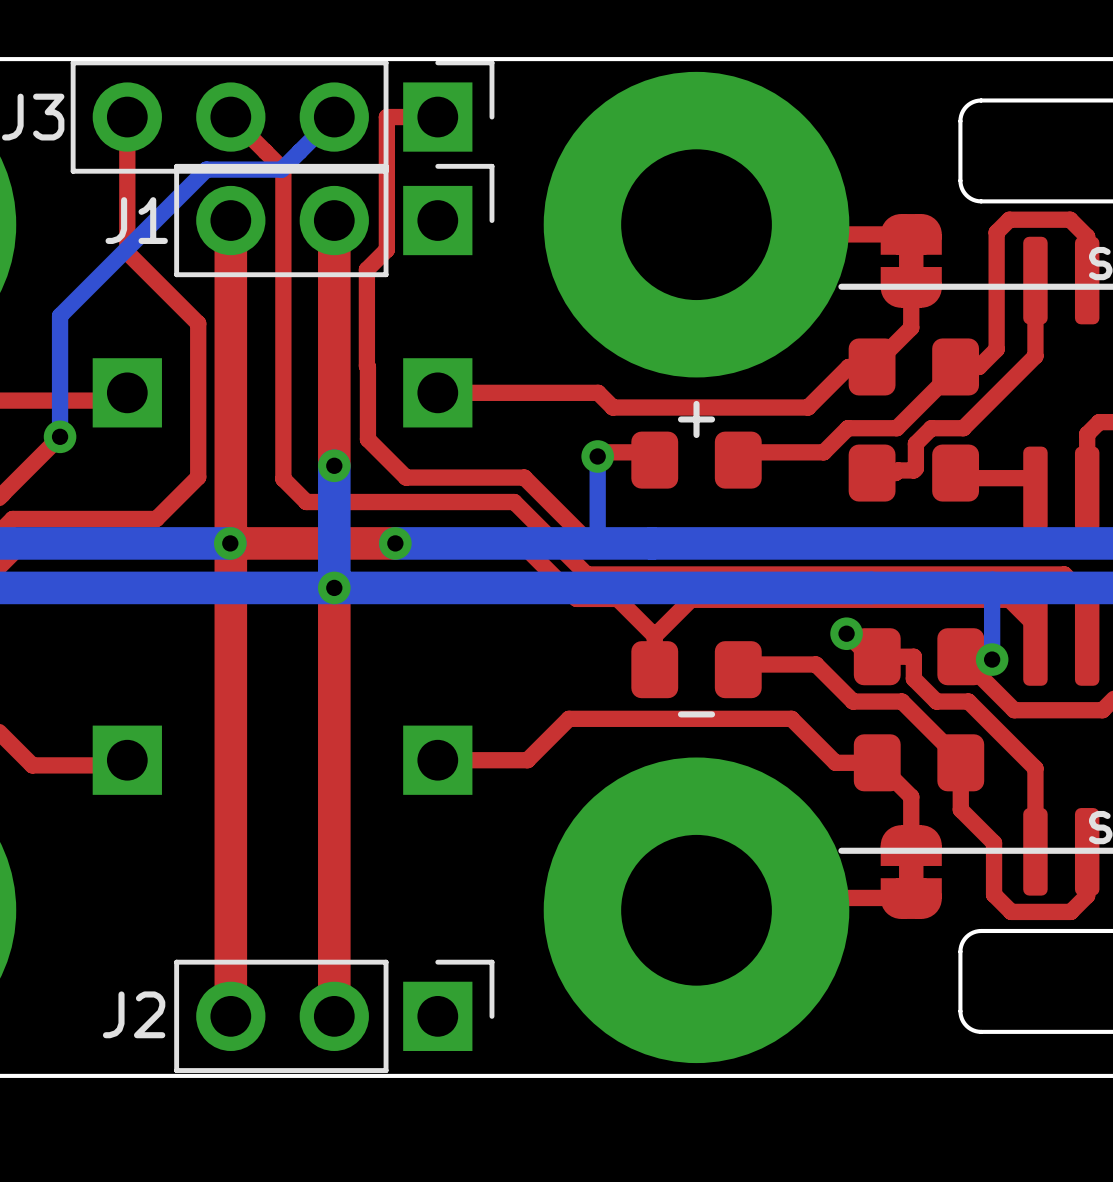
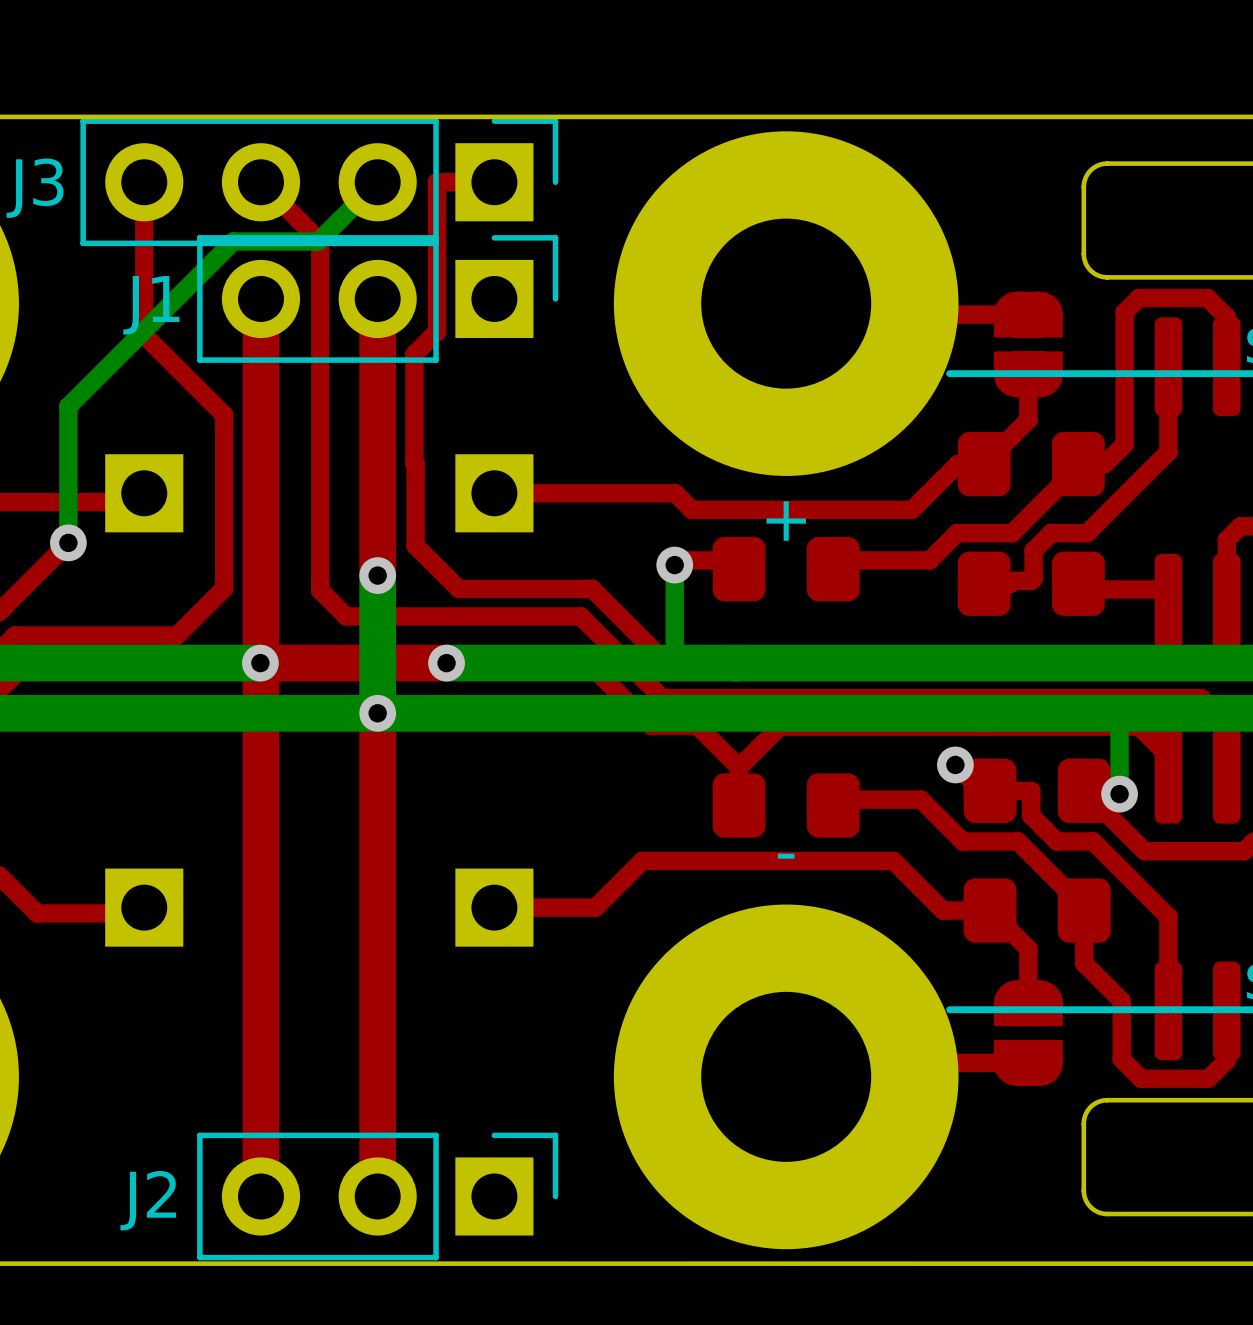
part footprint: [880, 214, 942, 308] -> [993, 291, 1063, 398]
part footprint: [880, 825, 942, 919] -> [993, 980, 1063, 1086]

